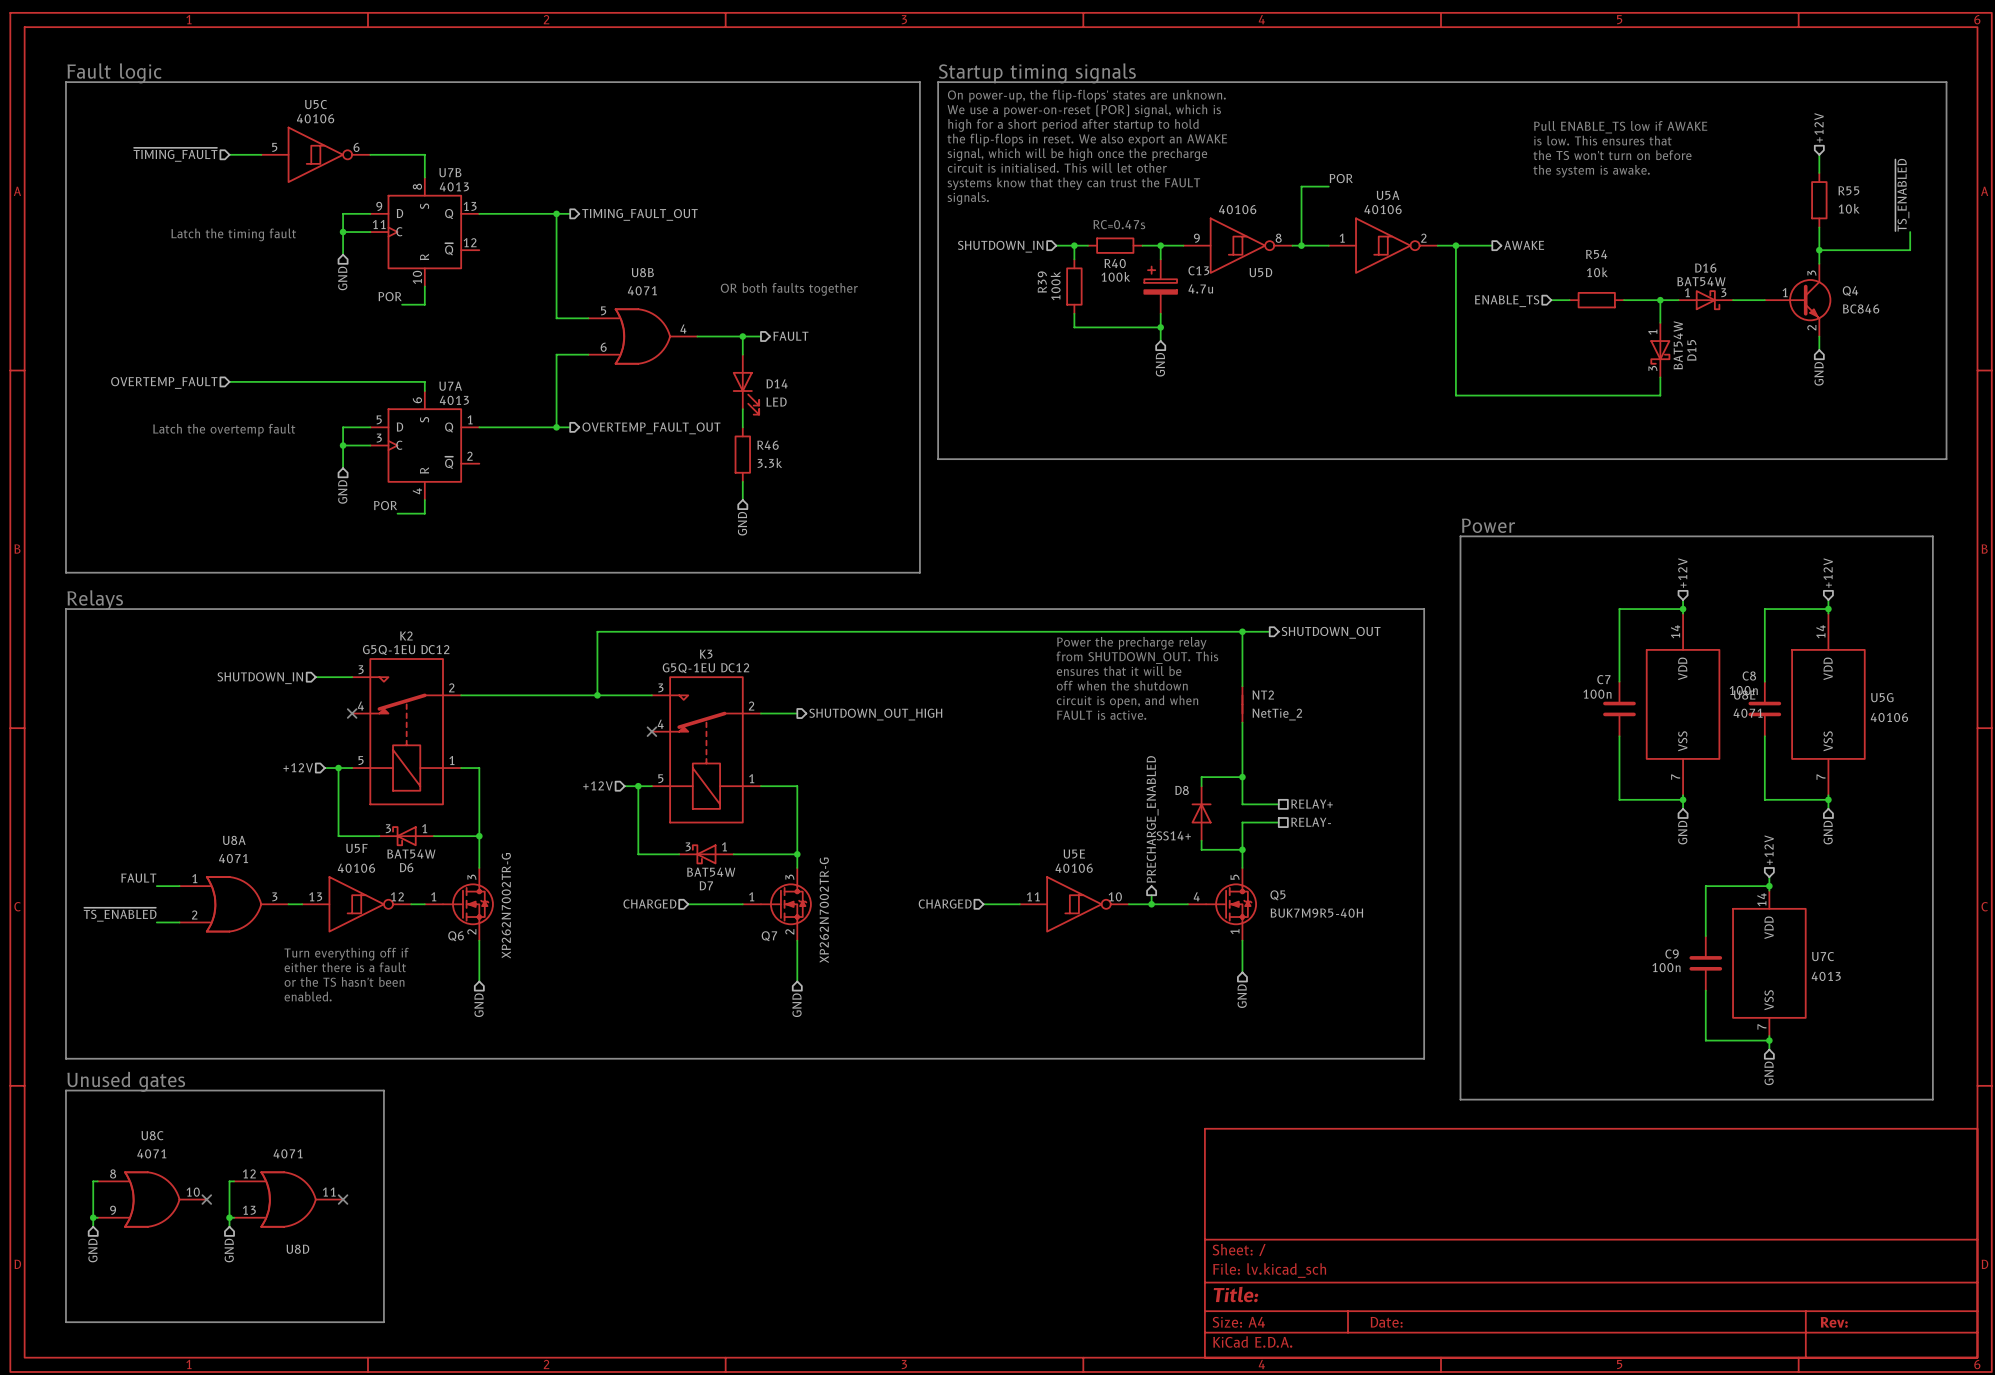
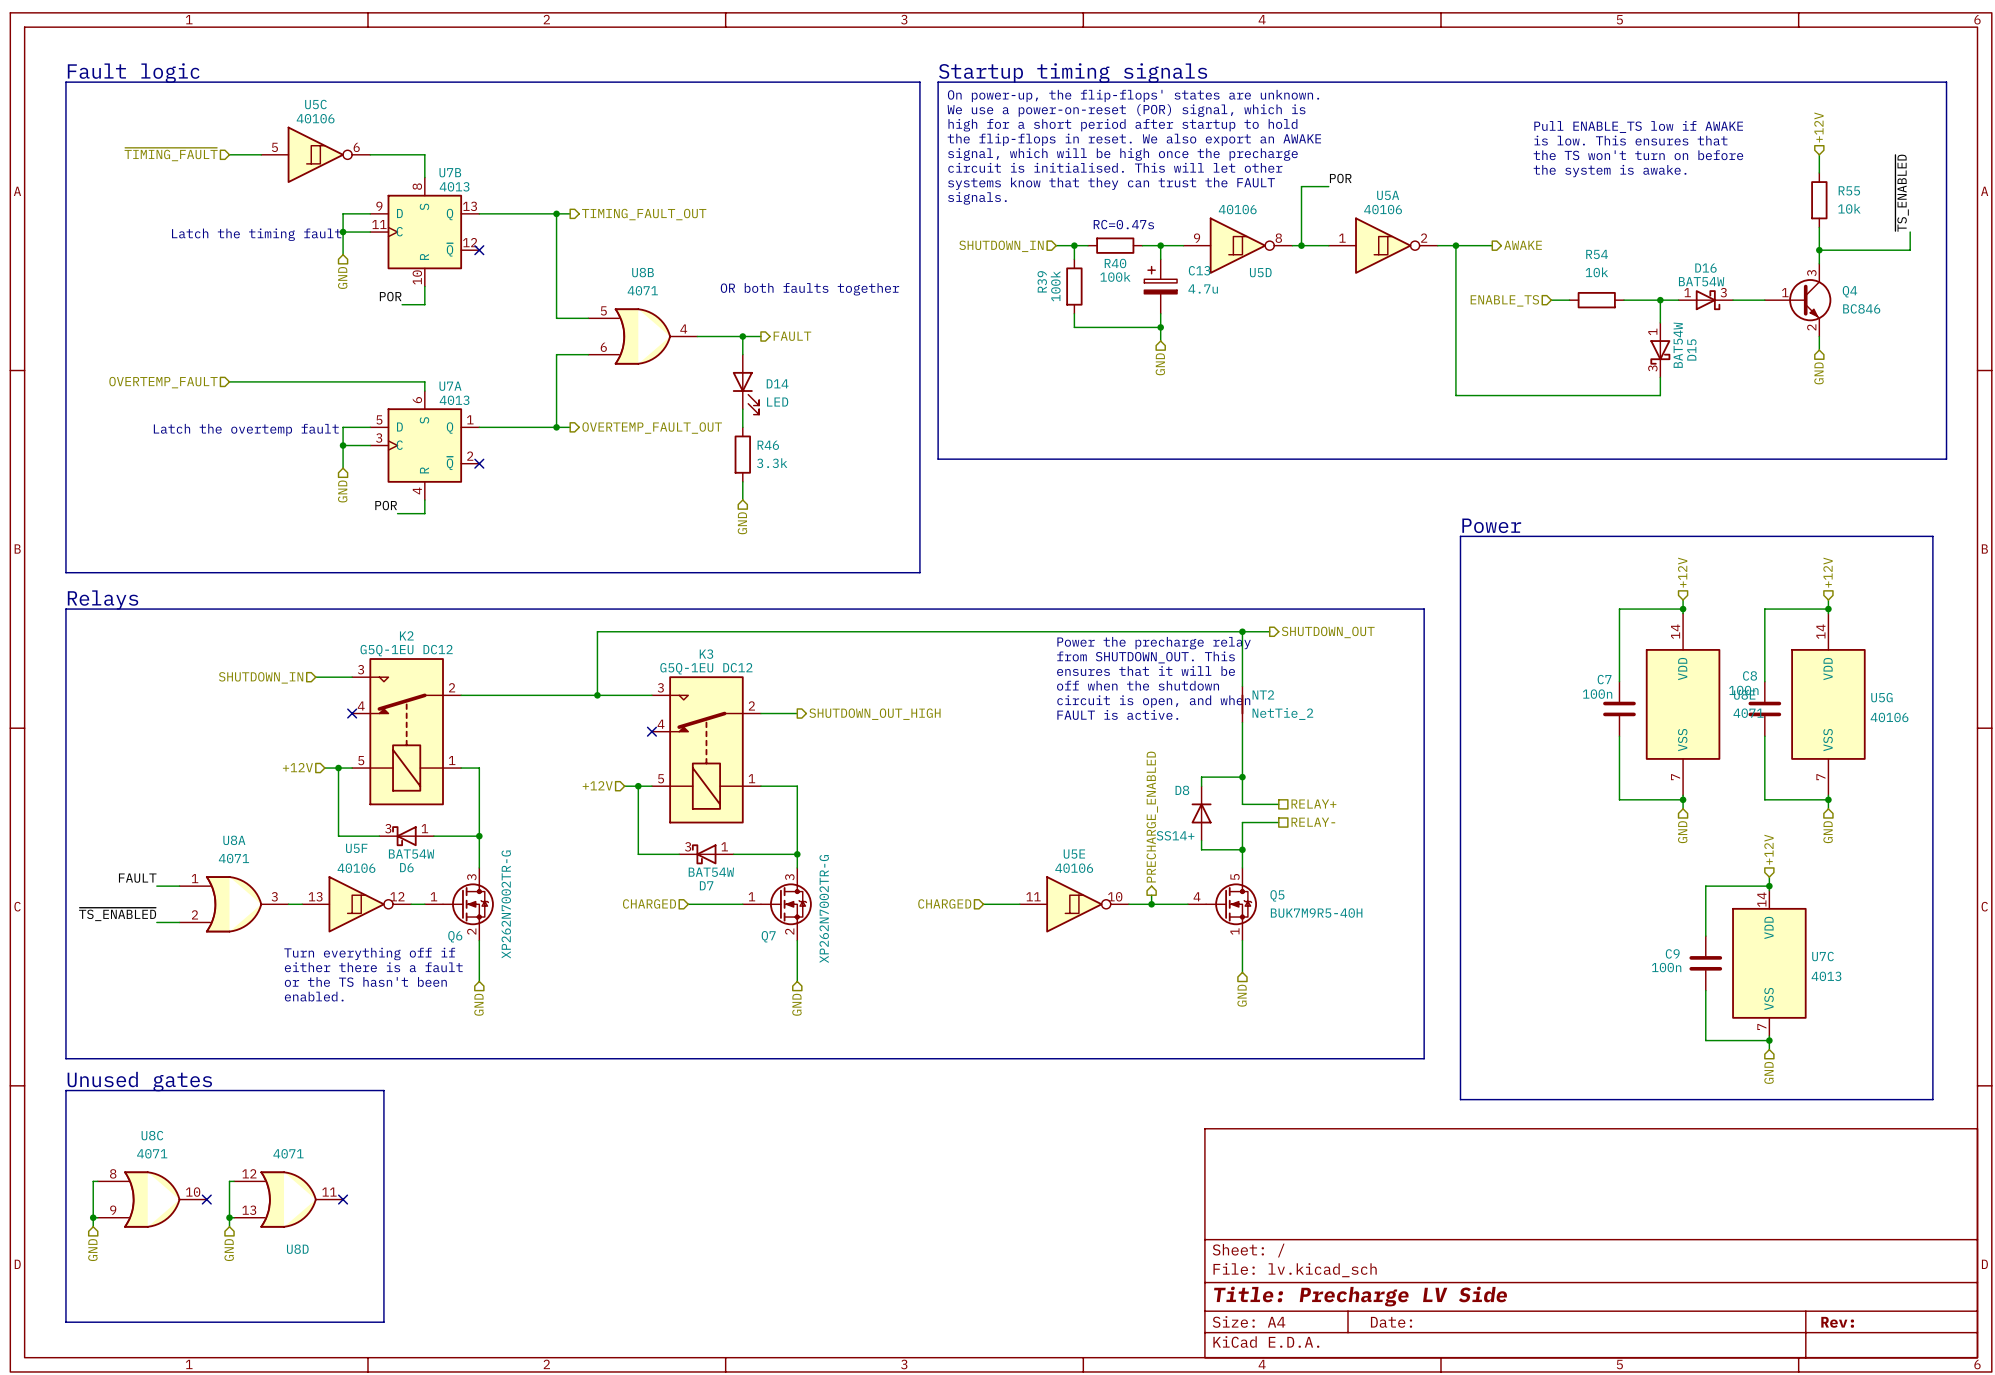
no-connect mark: none -> (479, 250)
no-connect mark: none -> (479, 463)
title block: Title: (1235, 1294) -> Title: Precharge LV Side (1360, 1296)

